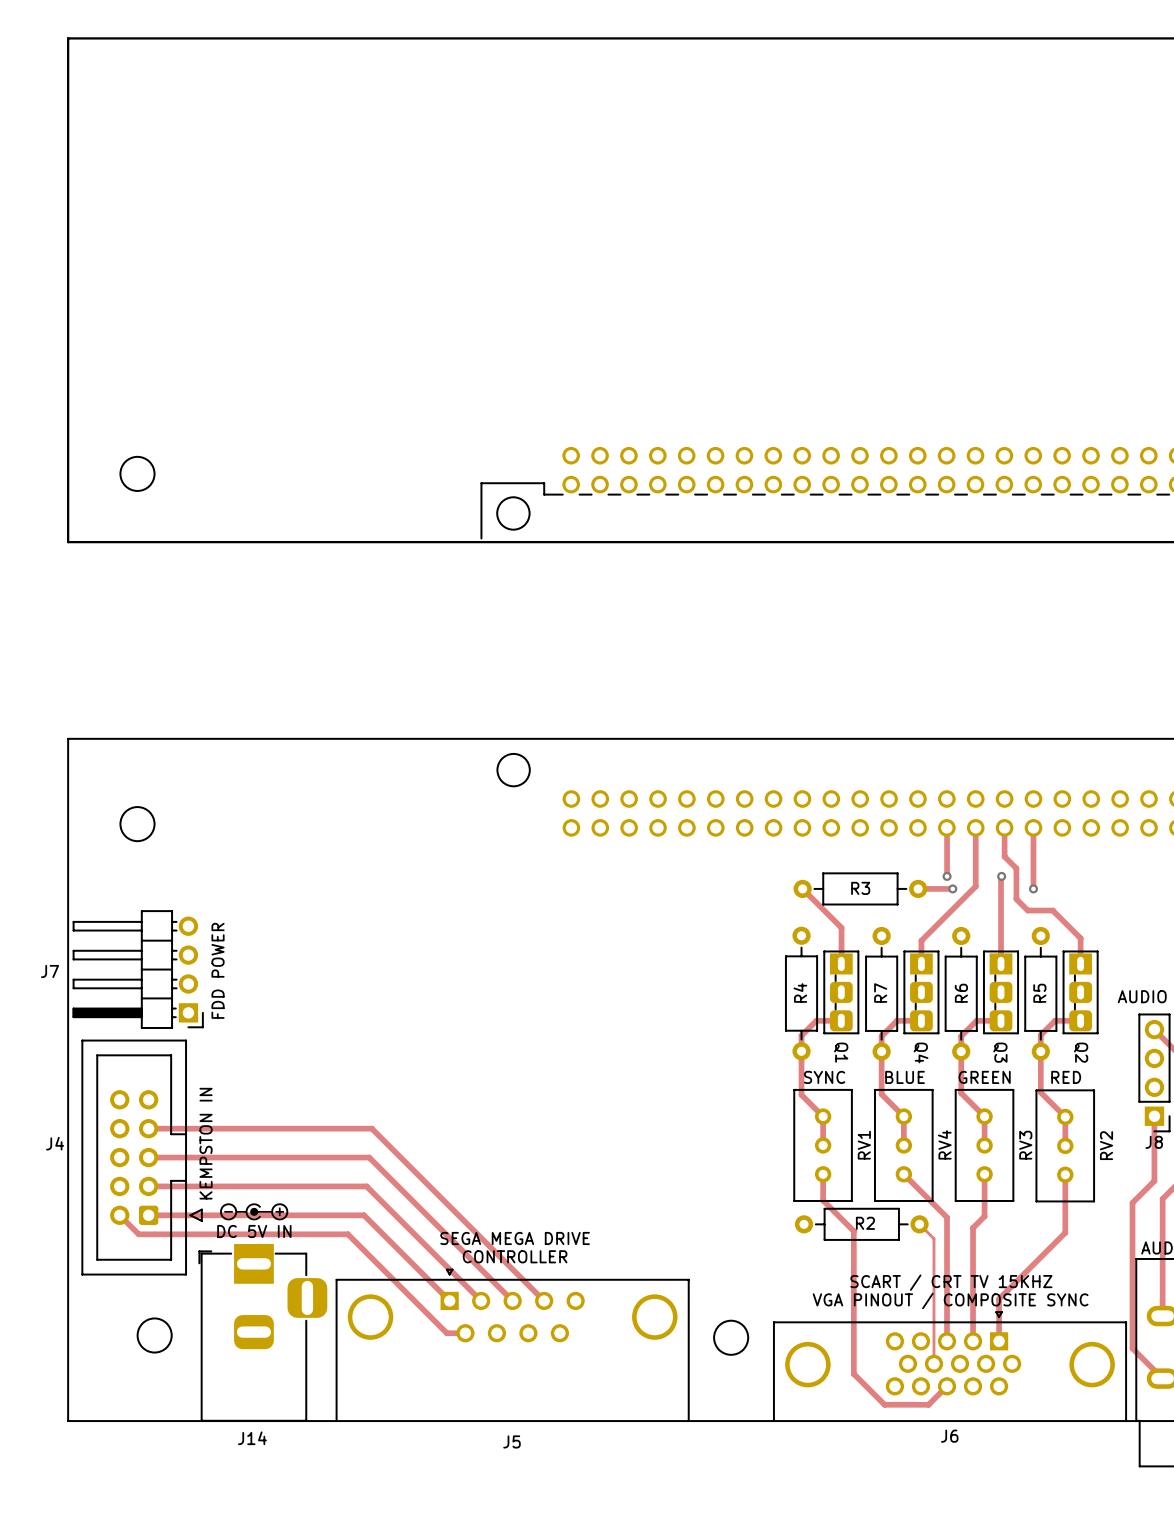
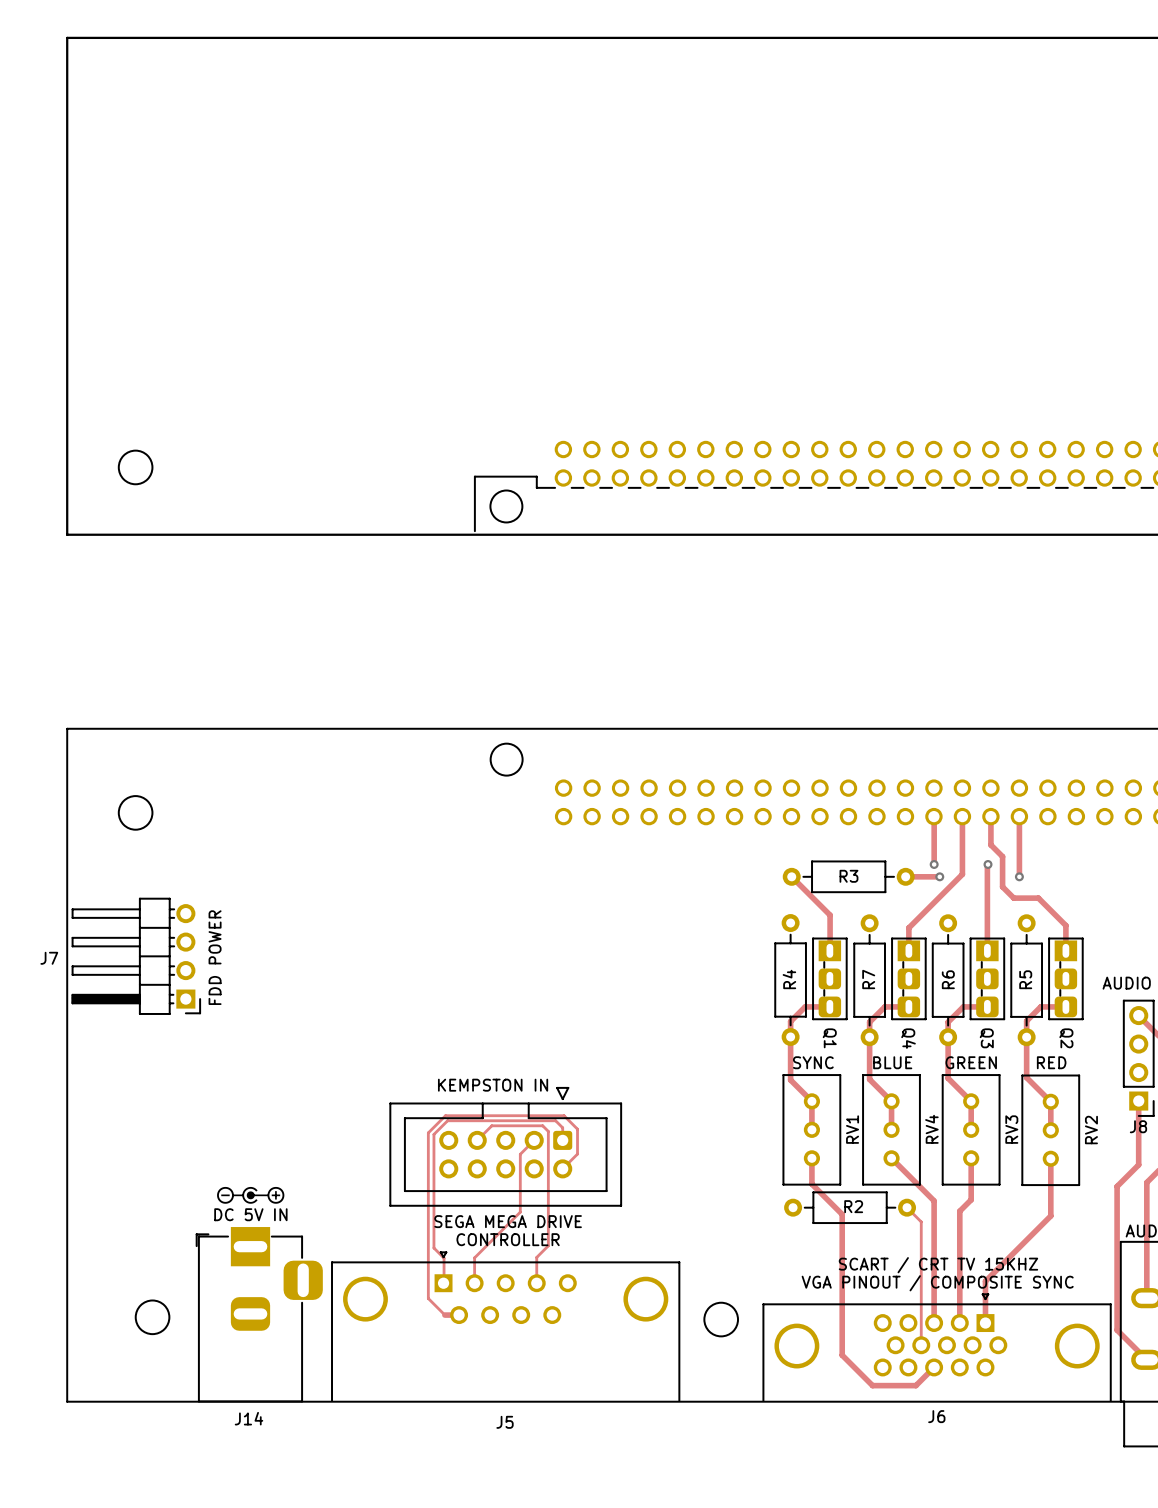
track: (148, 1128) (371, 1128) (544, 1300) -> (477, 1140) (491, 1125) (542, 1125) (548, 1131) (548, 1245) (536, 1257) (536, 1283)
text rotation: 0° (206, 1143) -> 90° clockwise (493, 1085)
text position: KEMPSTON IN (206, 1143) -> KEMPSTON IN (493, 1085)
J4: (142, 1157) -> none
track: (148, 1157) (369, 1157) (512, 1300) -> none
part: none -> (505, 1146)
track: (148, 1186) (366, 1186) (481, 1300) -> (534, 1140) (520, 1154) (520, 1212) (474, 1257) (474, 1283)
track: (119, 1215) (138, 1234) (347, 1234) (446, 1333) (451, 1333) -> (562, 1168) (577, 1154) (577, 1129) (564, 1115) (445, 1115) (428, 1132) (428, 1298) (444, 1315)
track: (148, 1215) (364, 1215) (449, 1300) -> (562, 1140) (562, 1127) (555, 1120) (447, 1120) (433, 1134) (433, 1248) (444, 1258) (443, 1283)

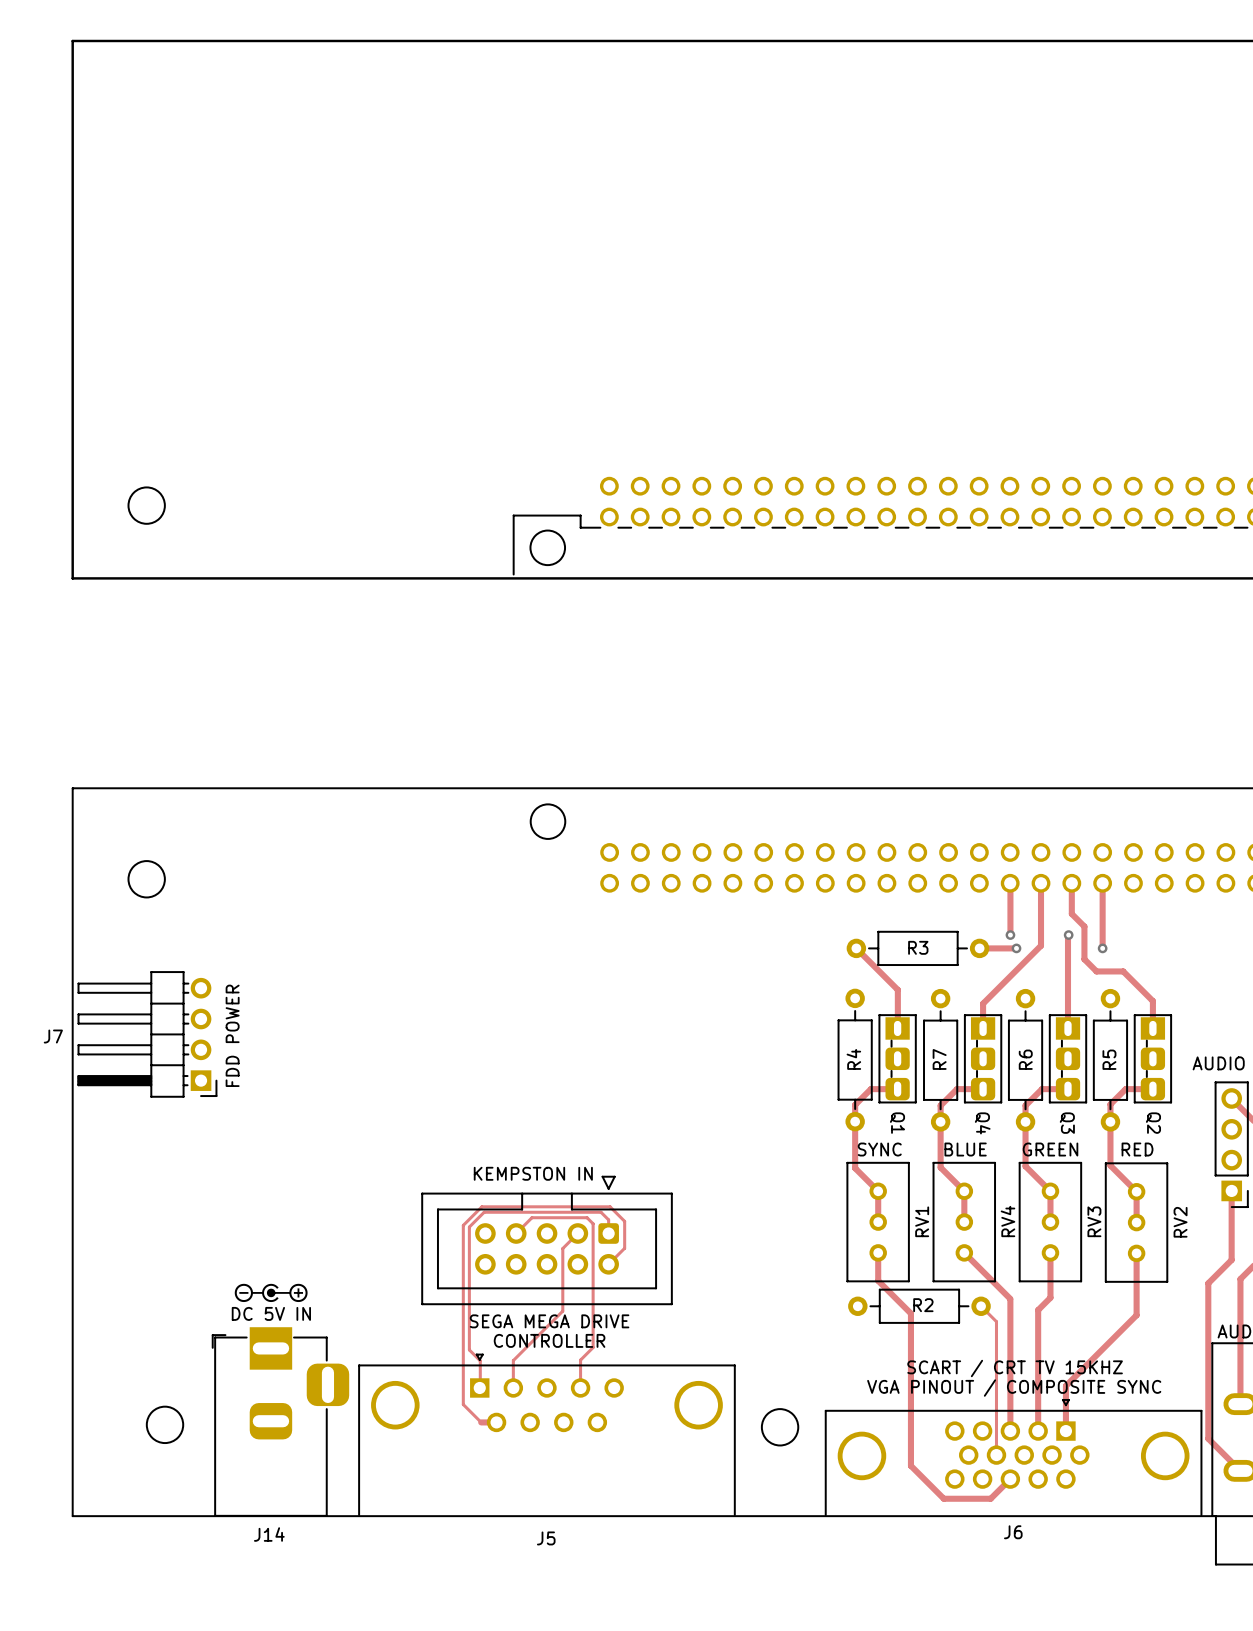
J8 name: J8 (1138, 1126) -> none

